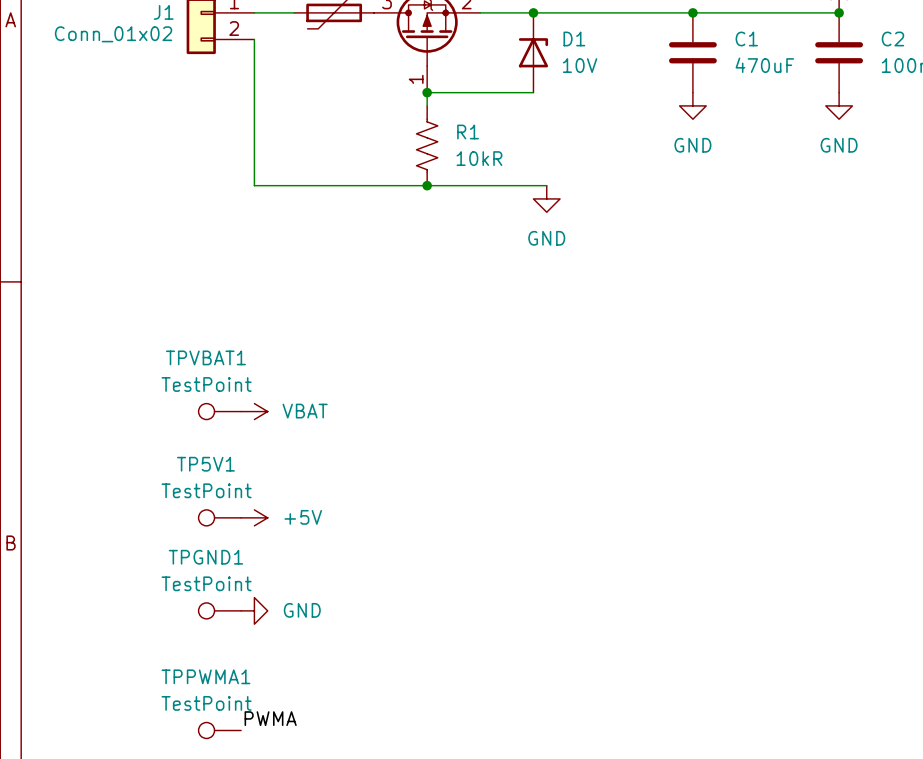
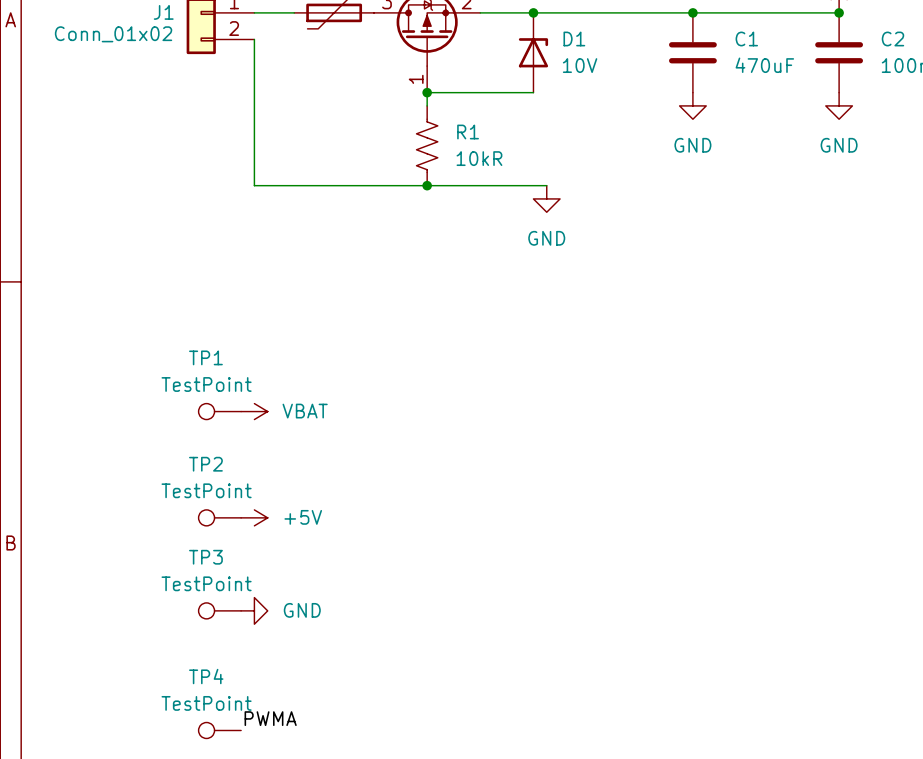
TPVBAT1 name: TPVBAT1 (205, 357) -> TP1 (205, 357)
TP5V1 name: TP5V1 (205, 464) -> TP2 (205, 464)
TPGND1 name: TPGND1 (205, 557) -> TP3 (205, 557)
TPPWMA1 name: TPPWMA1 (205, 676) -> TP4 (206, 676)

